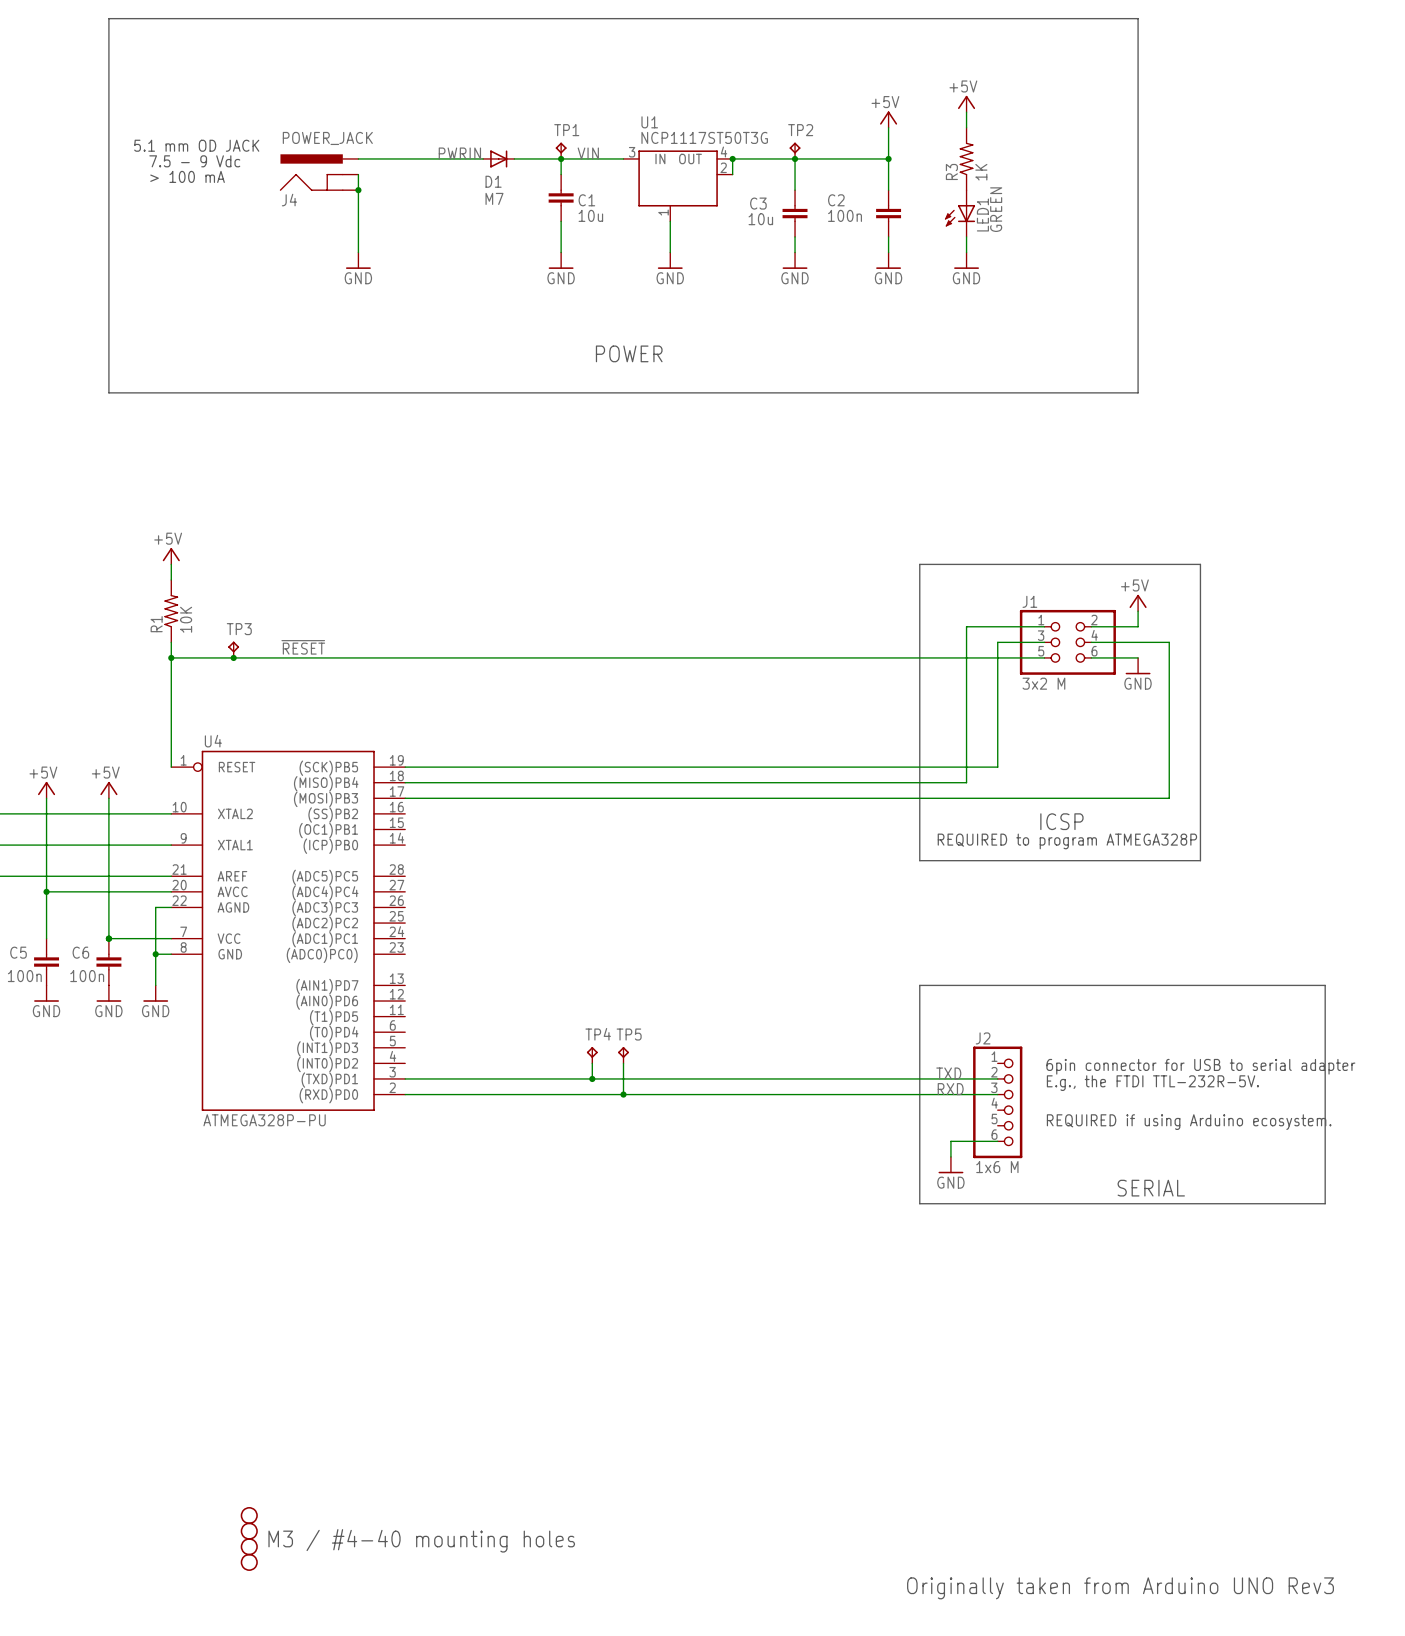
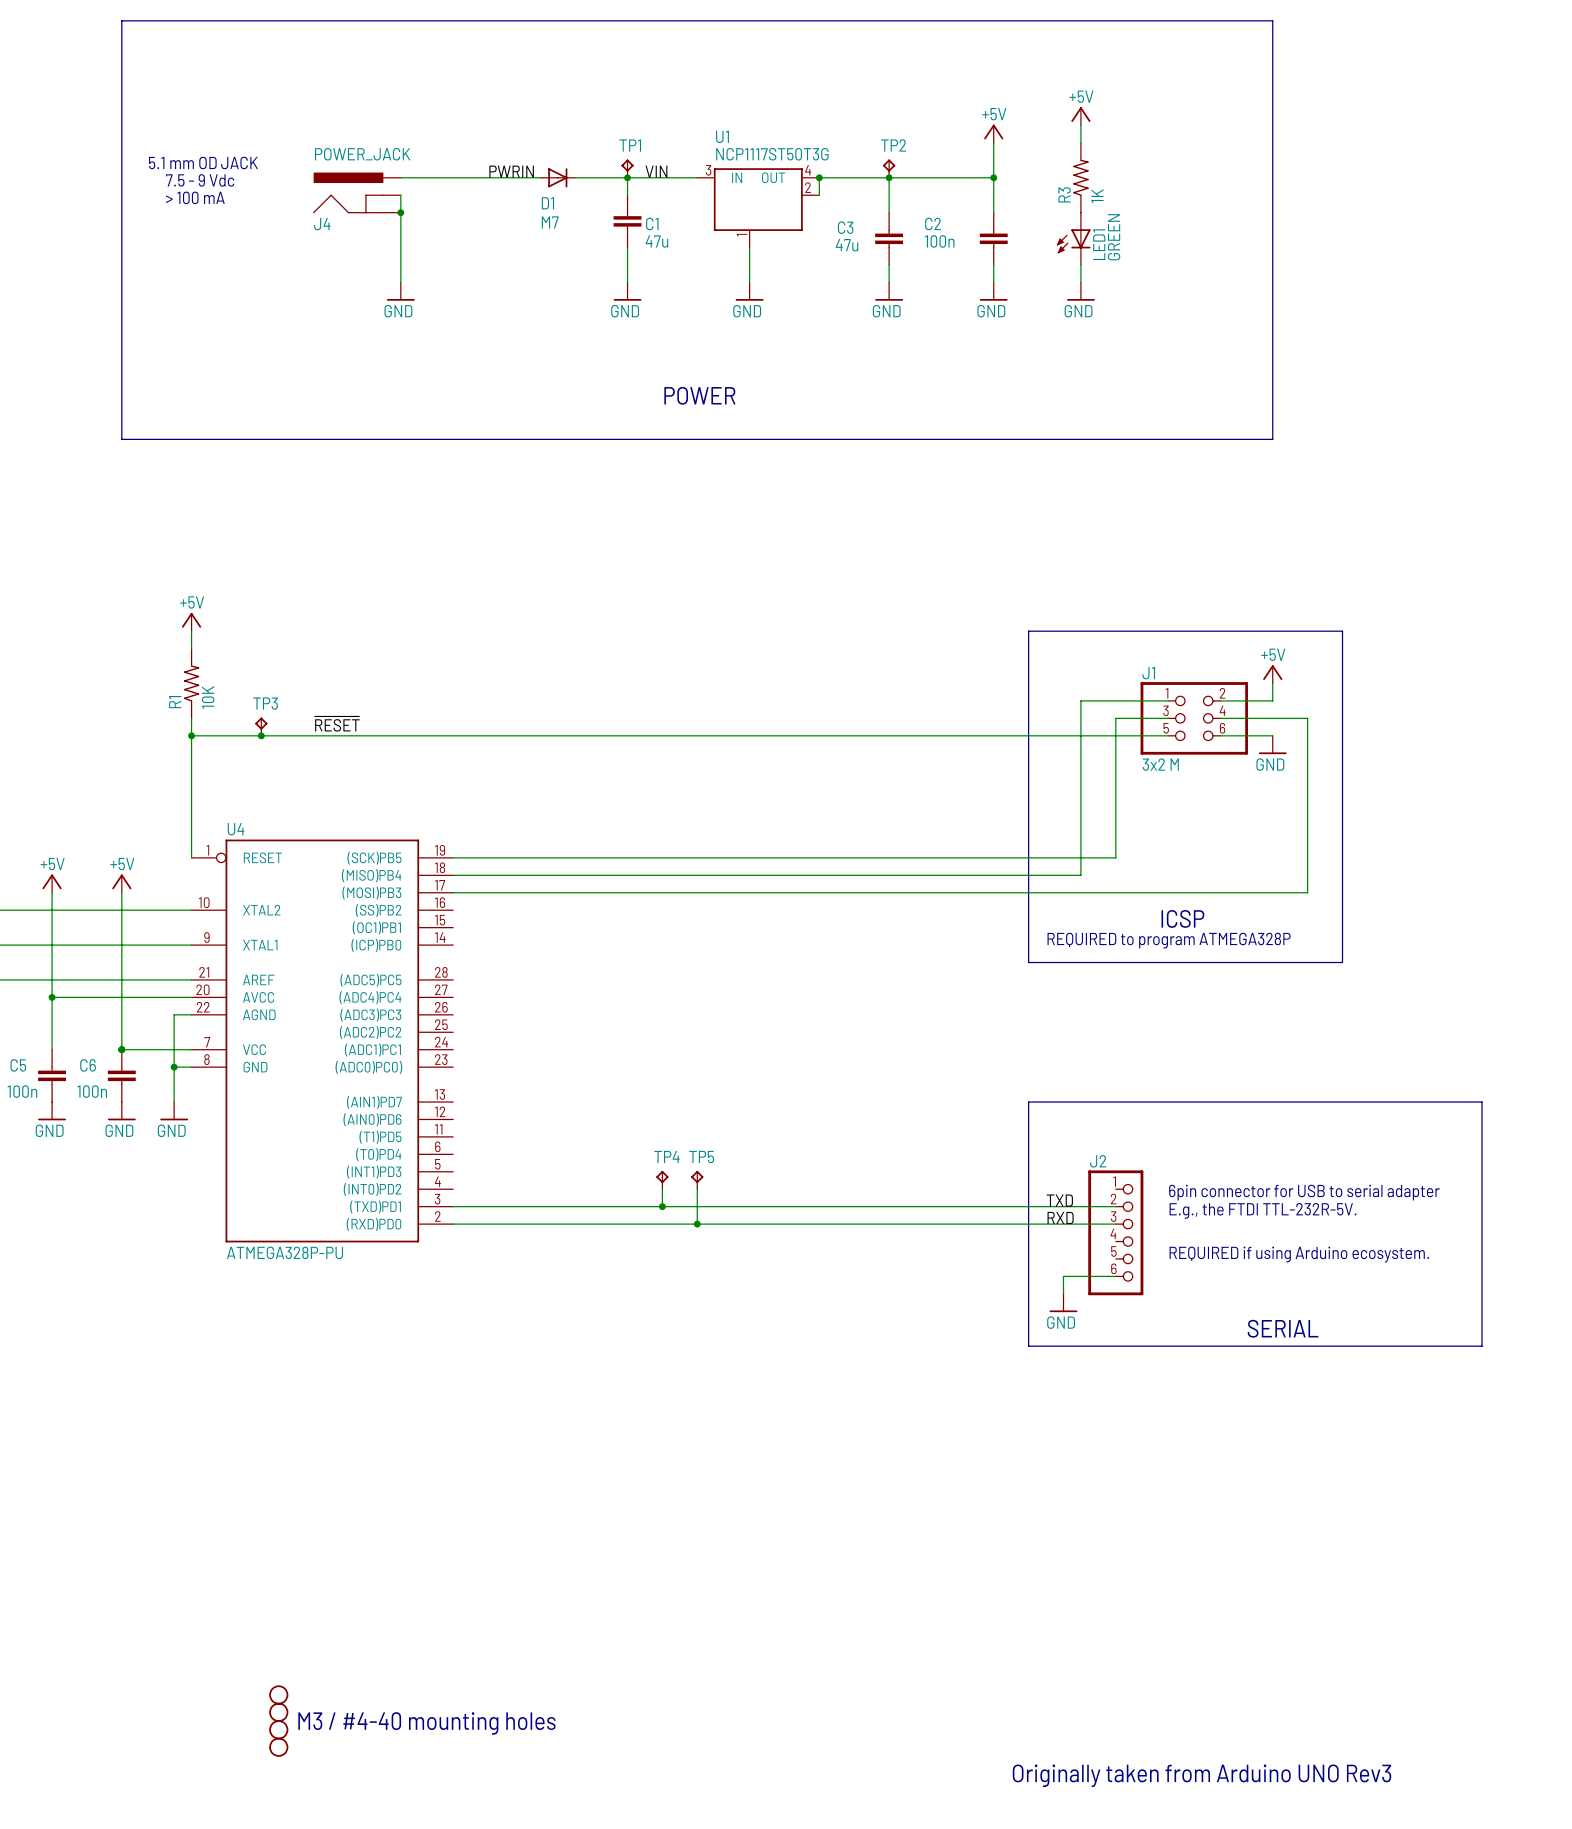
C1 value: 10u (590, 215) -> 47u (656, 241)
C3 value: 10u (760, 219) -> 47u (847, 245)
J2 value: 1x6 M (997, 1167) -> none

